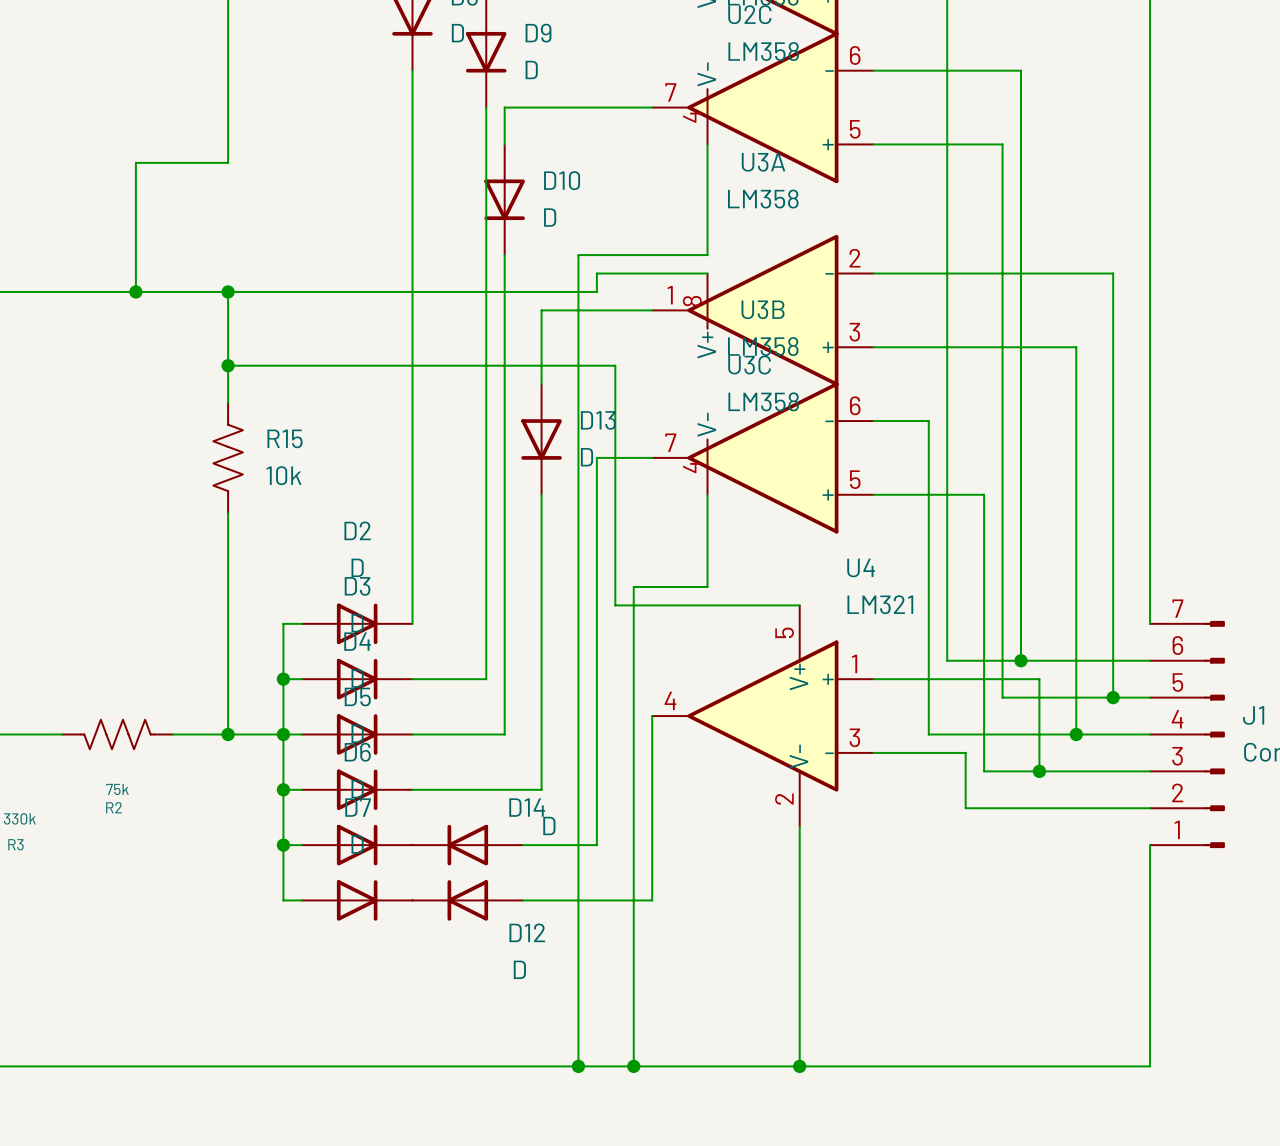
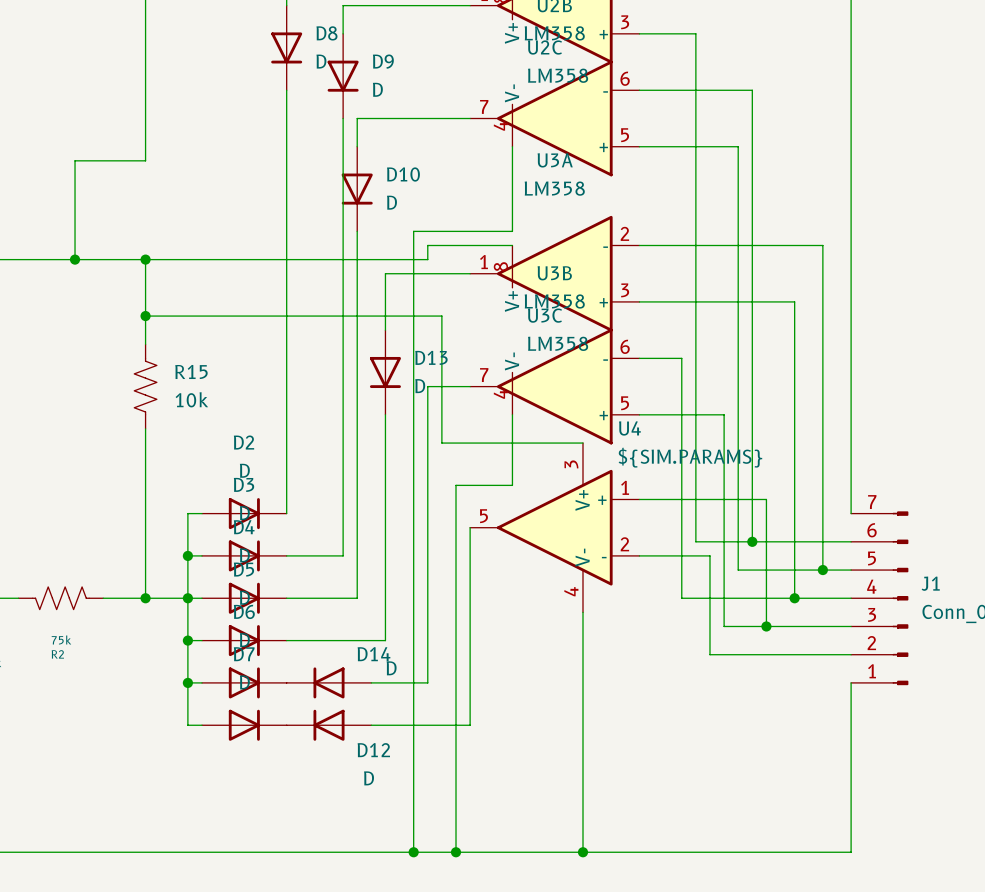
wire: (615, 531) (615, 605) (799, 605) -> (441, 443) (582, 443)
U4 name position: U4 (861, 567) -> U4 (629, 428)
U4 value: LM321 (880, 604) -> ${SIM.PARAMS} (690, 457)
wire: none -> (639, 499) (766, 499) (766, 555)
U4 pin number: 5 (784, 632) -> 3 (571, 464)
wire: none -> (470, 527) (470, 584)
wire: (965, 679) (1039, 679) -> (709, 555) (709, 612)
U4 pin number: 4 (670, 700) -> 5 (483, 516)
U4 position: (762, 716) -> (554, 527)
U4 pin number: 3 (854, 737) -> 2 (624, 544)
wire: (873, 752) (965, 752) -> none
U4 pin number: 2 (784, 799) -> 4 (571, 591)

